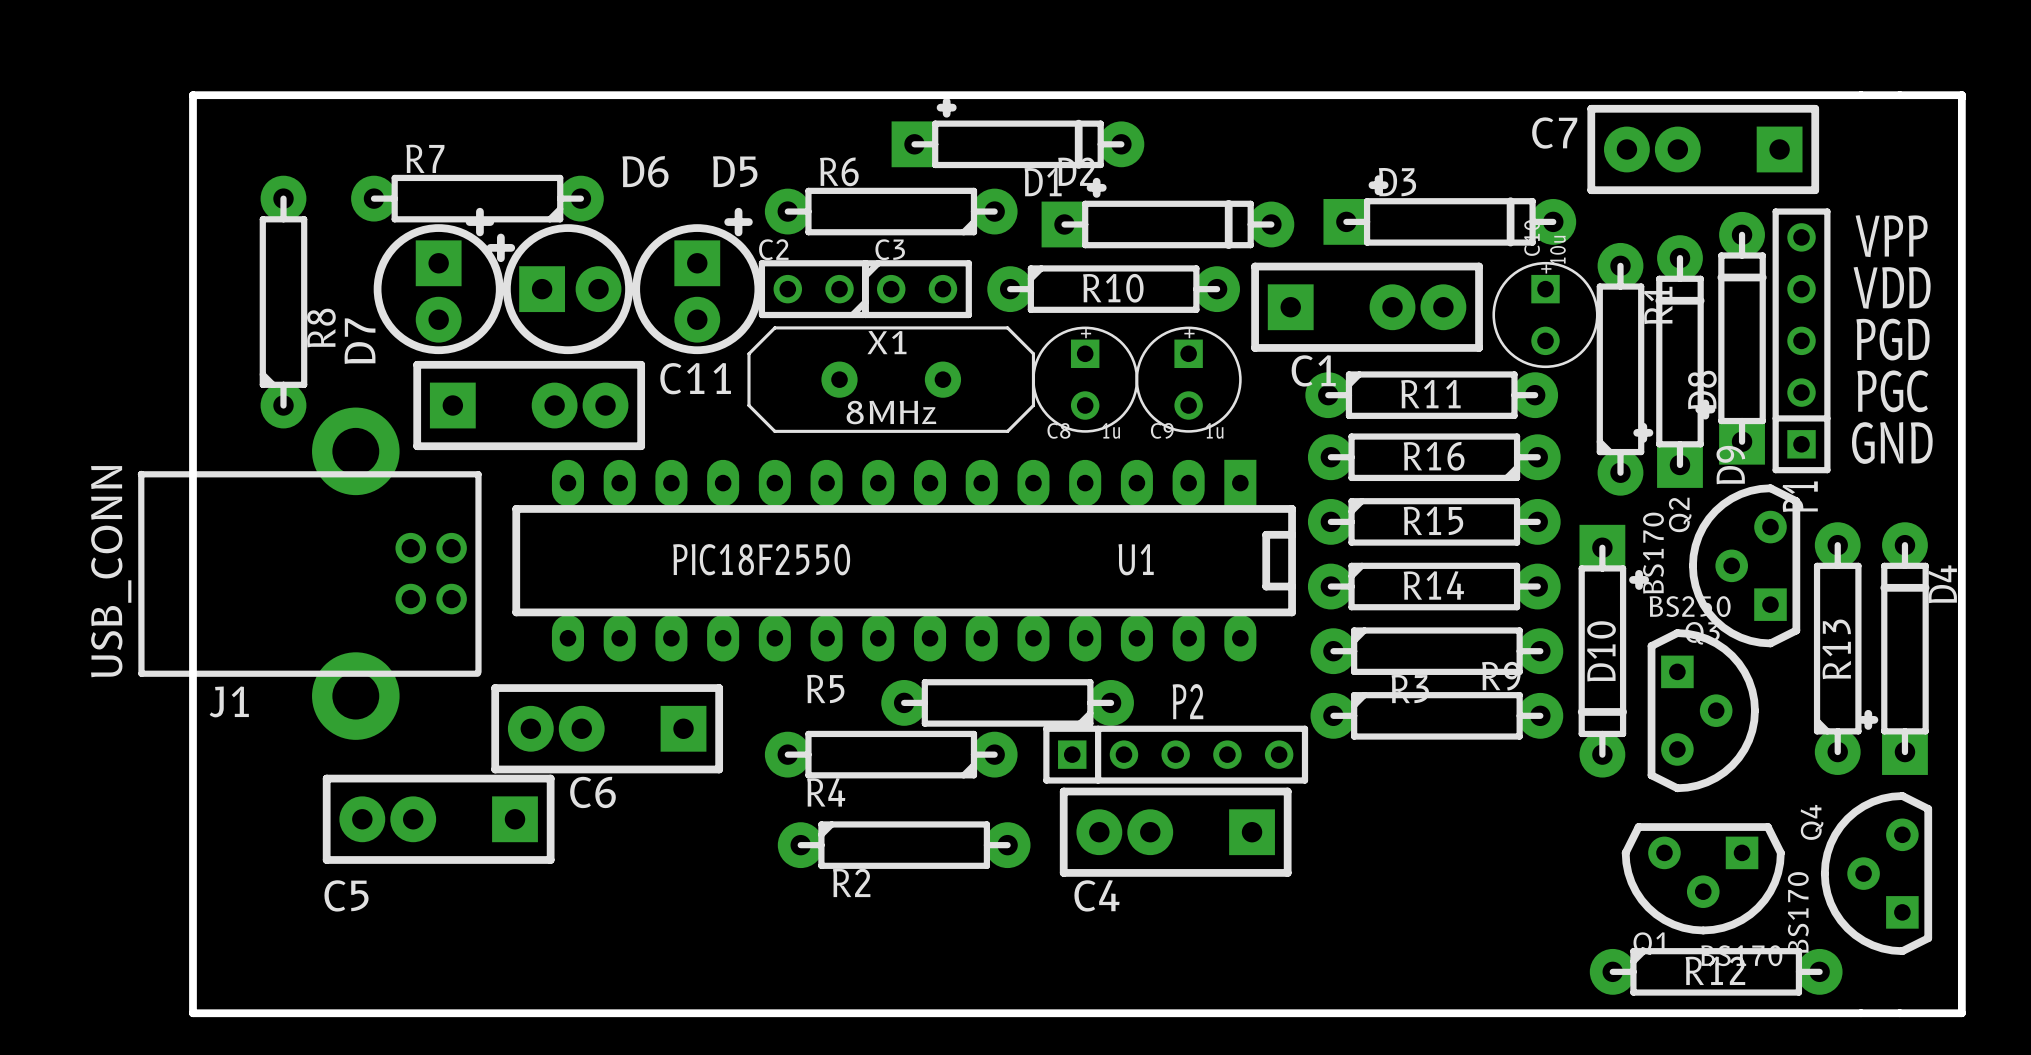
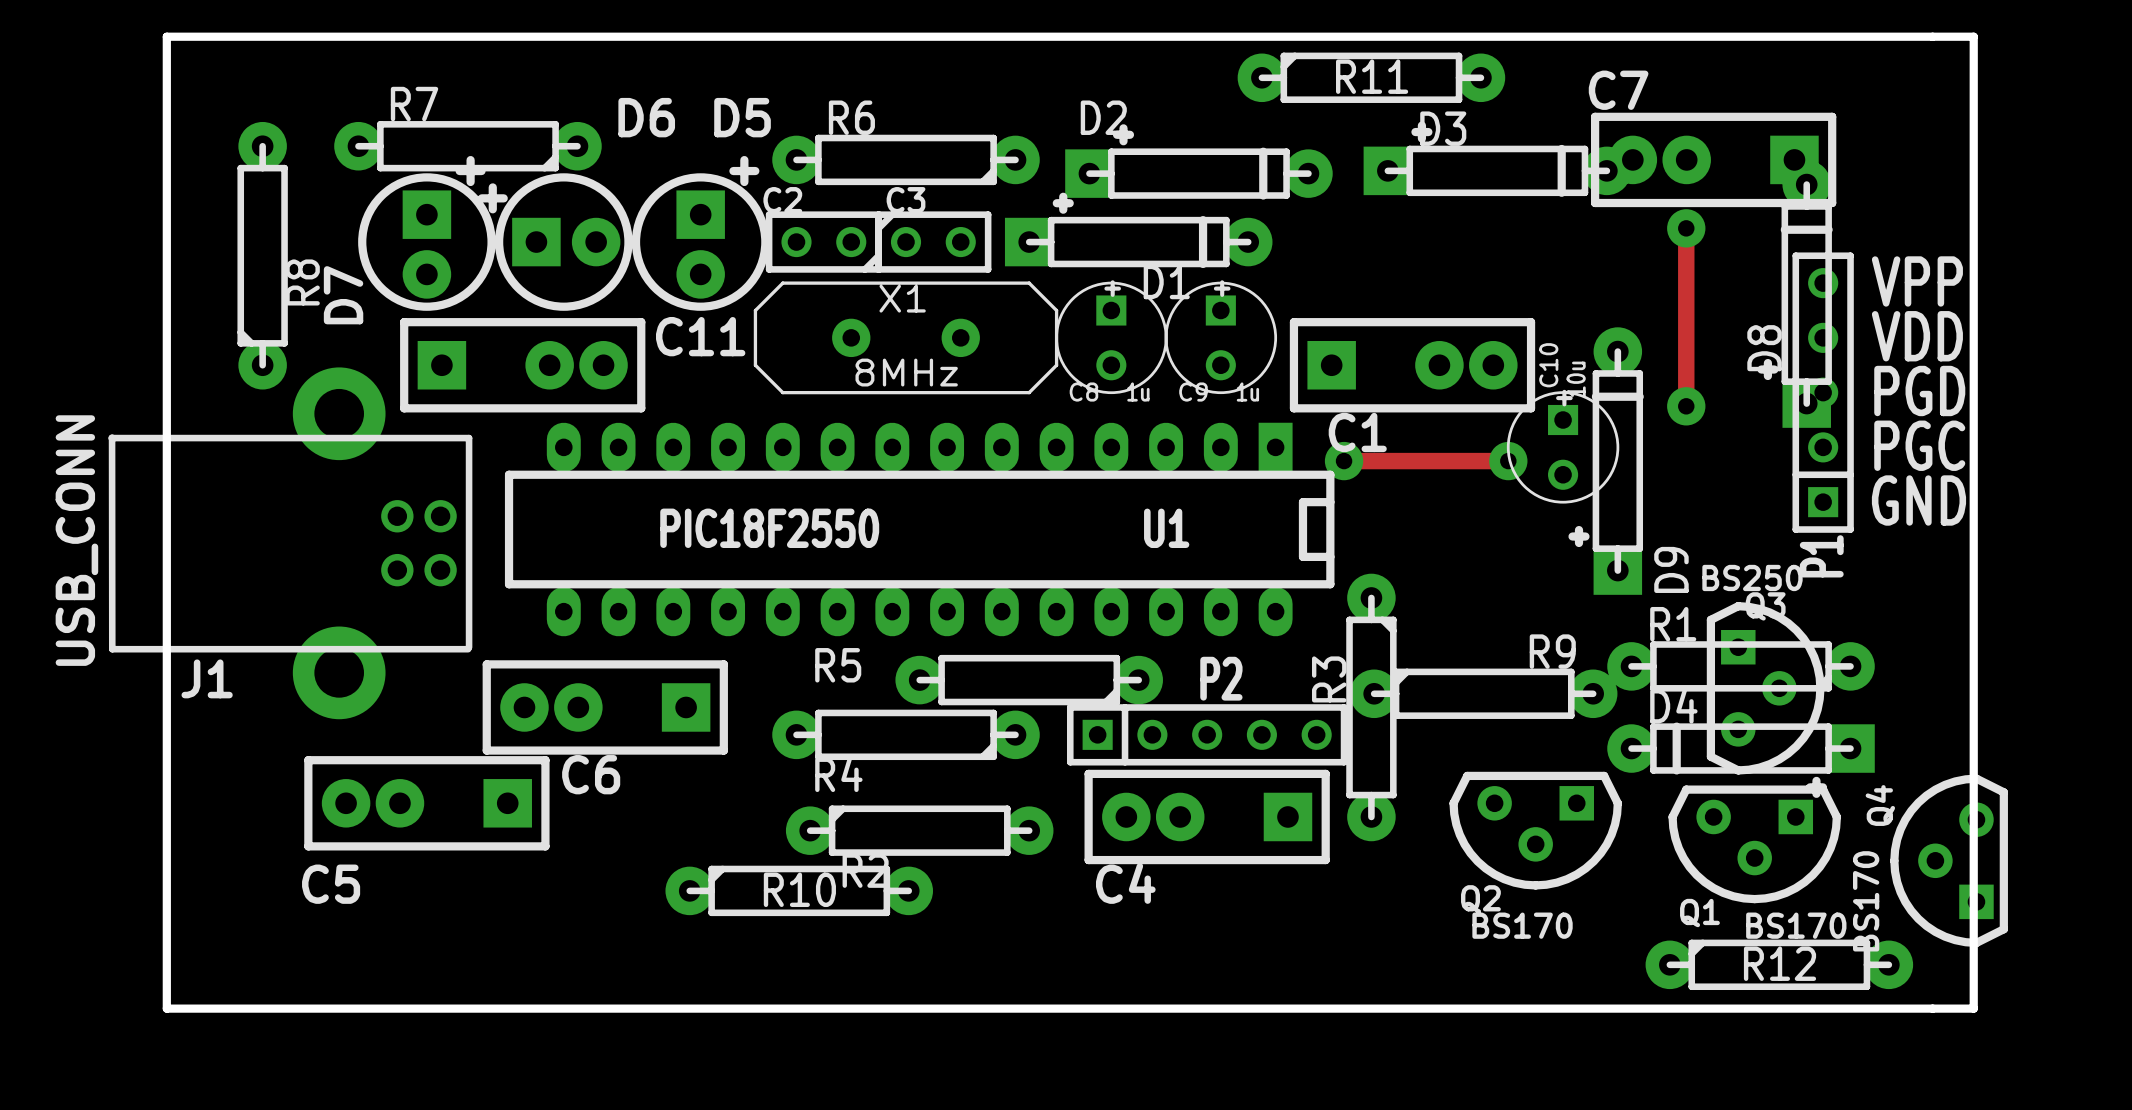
board edge: (1899, 95) (1961, 95) (1961, 1013) (1899, 1013) -> (1973, 36) (1973, 1008)
D1 position: (1017, 133) -> (1138, 230)
C7 name position: C7 (1554, 133) -> C7 (1618, 90)
C7 position: (1703, 149) -> (1713, 159)
text position: VPP (1891, 236) -> VPP (1917, 281)
track: none -> (1686, 228) (1686, 406)
via: none -> (1686, 228)
text position: VDD (1892, 287) -> VDD (1917, 336)
R10 position: (1113, 289) -> (799, 890)
C1 position: (1367, 307) -> (1412, 365)
C10 position: (1545, 315) -> (1563, 447)
text position: PGD (1893, 339) -> PGD (1919, 390)
P1 position: (1801, 340) -> (1823, 392)
D9 position: (1668, 361) -> (1606, 461)
R1 rotation: 0° (1620, 369) -> 90° counterclockwise (1741, 666)
R1 position: (1620, 369) -> (1741, 666)
text position: PGC (1892, 391) -> PGC (1919, 445)
R11 position: (1431, 395) -> (1371, 77)
text position: GND (1892, 442) -> GND (1918, 500)
via: none -> (1686, 406)
R16: (1434, 457) -> none
track: none -> (1344, 461) (1508, 461)
via: none -> (1344, 461)
via: none -> (1508, 461)
R15: (1434, 521) -> none
Q2 rotation: 0° (1744, 565) -> 90° counterclockwise (1535, 830)
Q2 position: (1744, 565) -> (1535, 830)
R14: (1434, 586) -> none
R13: (1837, 648) -> none
D4 rotation: 0° (1893, 648) -> 90° counterclockwise (1741, 760)
D4 position: (1893, 648) -> (1741, 760)
R3 rotation: 0° (1436, 651) -> 90° clockwise (1371, 707)
D10: (1613, 651) -> none
Q1 position: (1703, 878) -> (1754, 844)

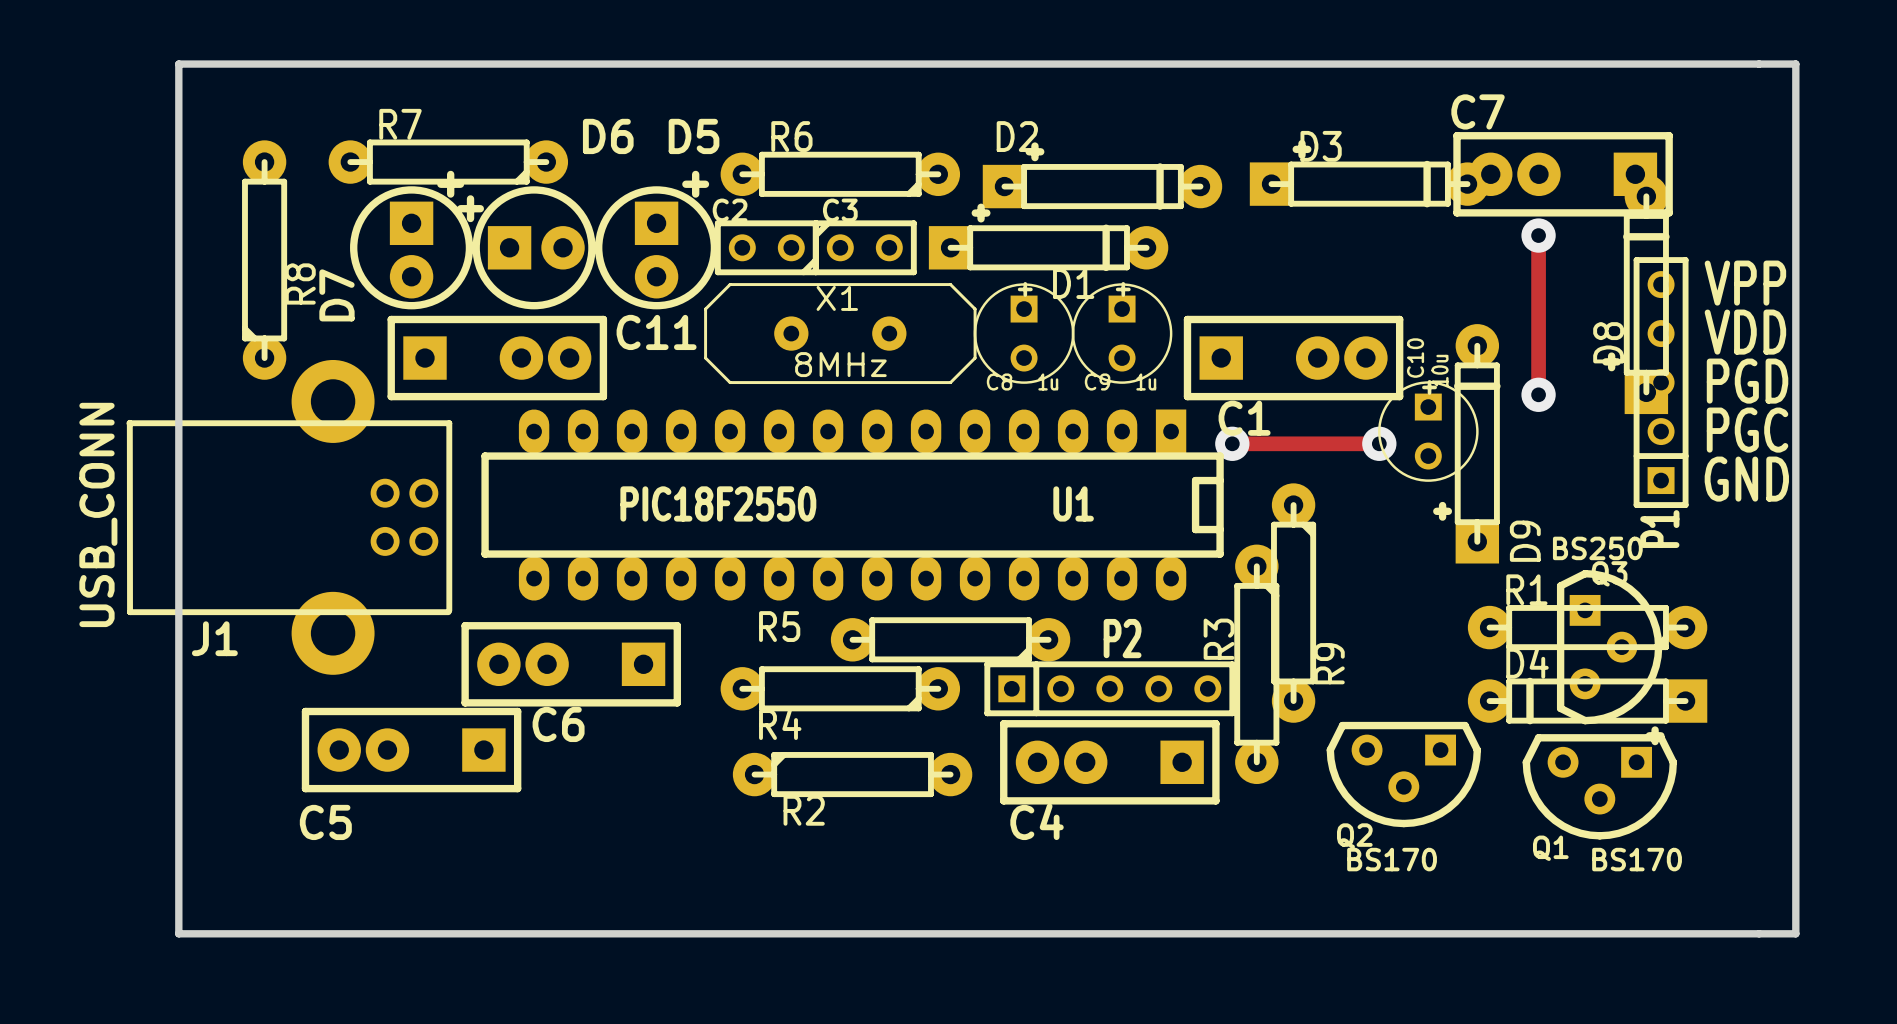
R11: (1371, 77) -> none
R9 rotation: 0° (1483, 693) -> 90° clockwise (1293, 603)
Q4: BS170 (1949, 860) -> none
R10: (799, 890) -> none
R12: (1779, 964) -> none

